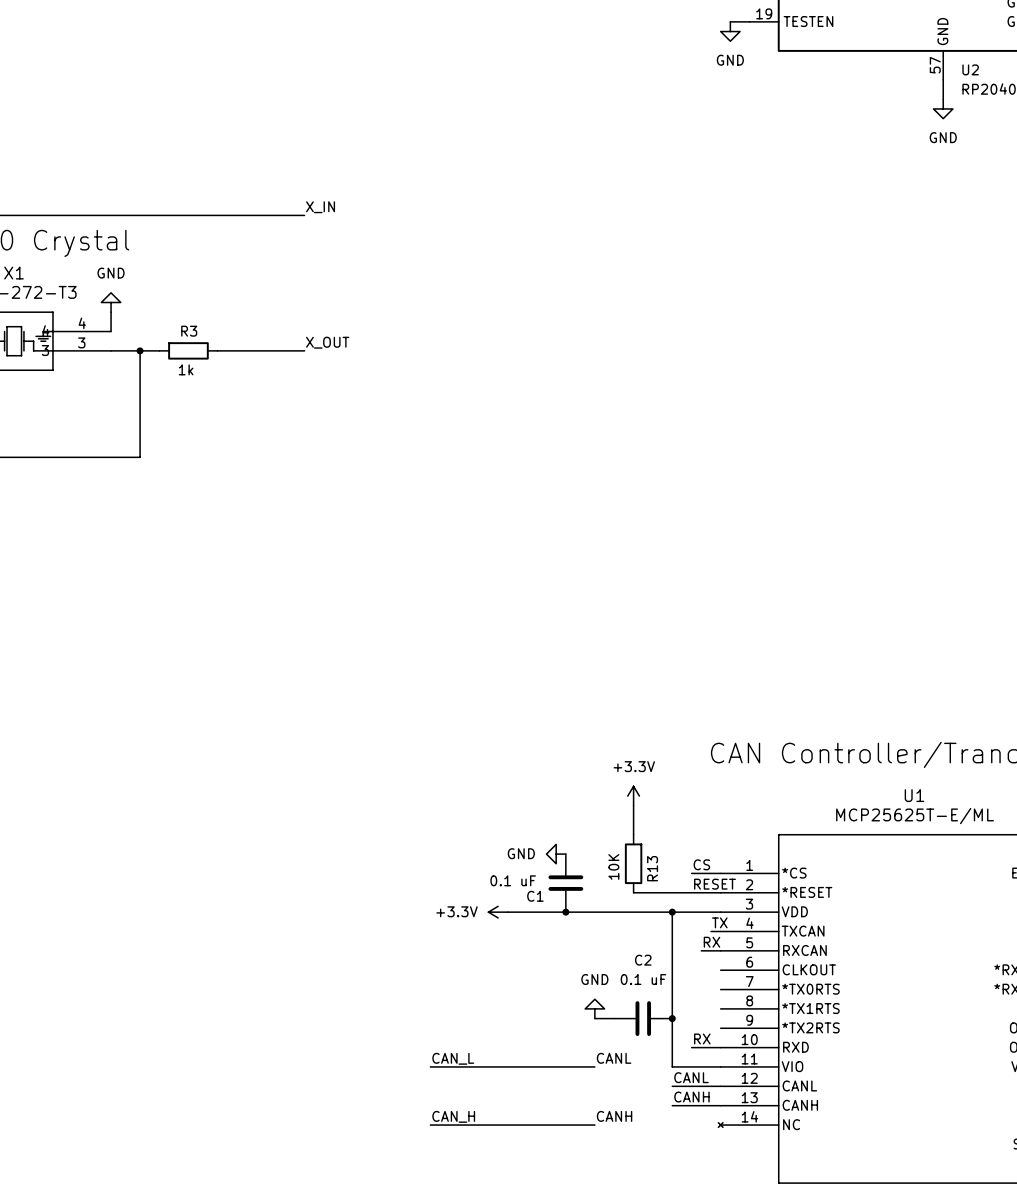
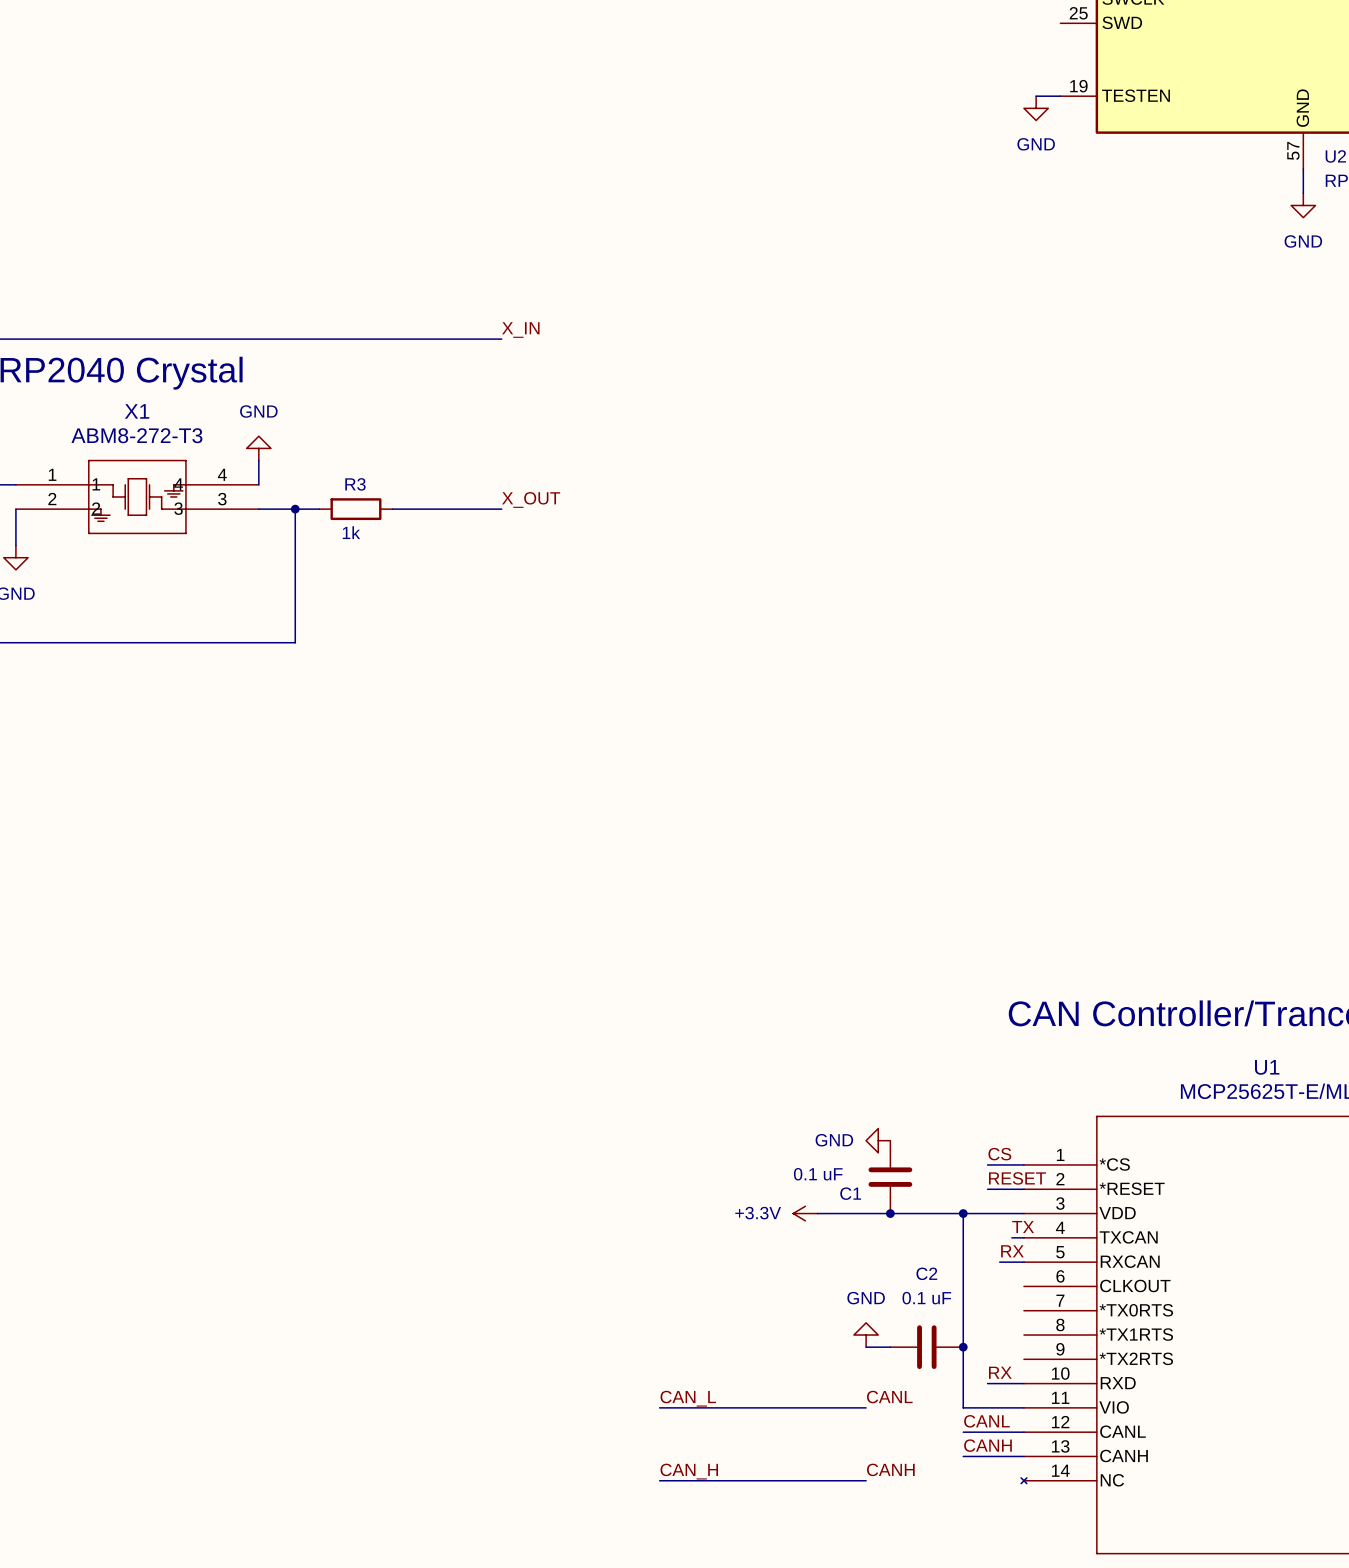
power symbol: +3.3V (633, 796) -> none
wire: (633, 805) (633, 834) -> none
power symbol position: GND (556, 854) -> GND (878, 1140)
R13: 10K (633, 863) -> none
C1 position: (565, 883) -> (890, 1177)
wire: (633, 892) (691, 892) -> none
power symbol position: +3.3V (498, 912) -> +3.3V (805, 1213)
wire: (507, 912) (556, 912) -> none
junction: (565, 912) -> none
junction: none -> (890, 1213)

